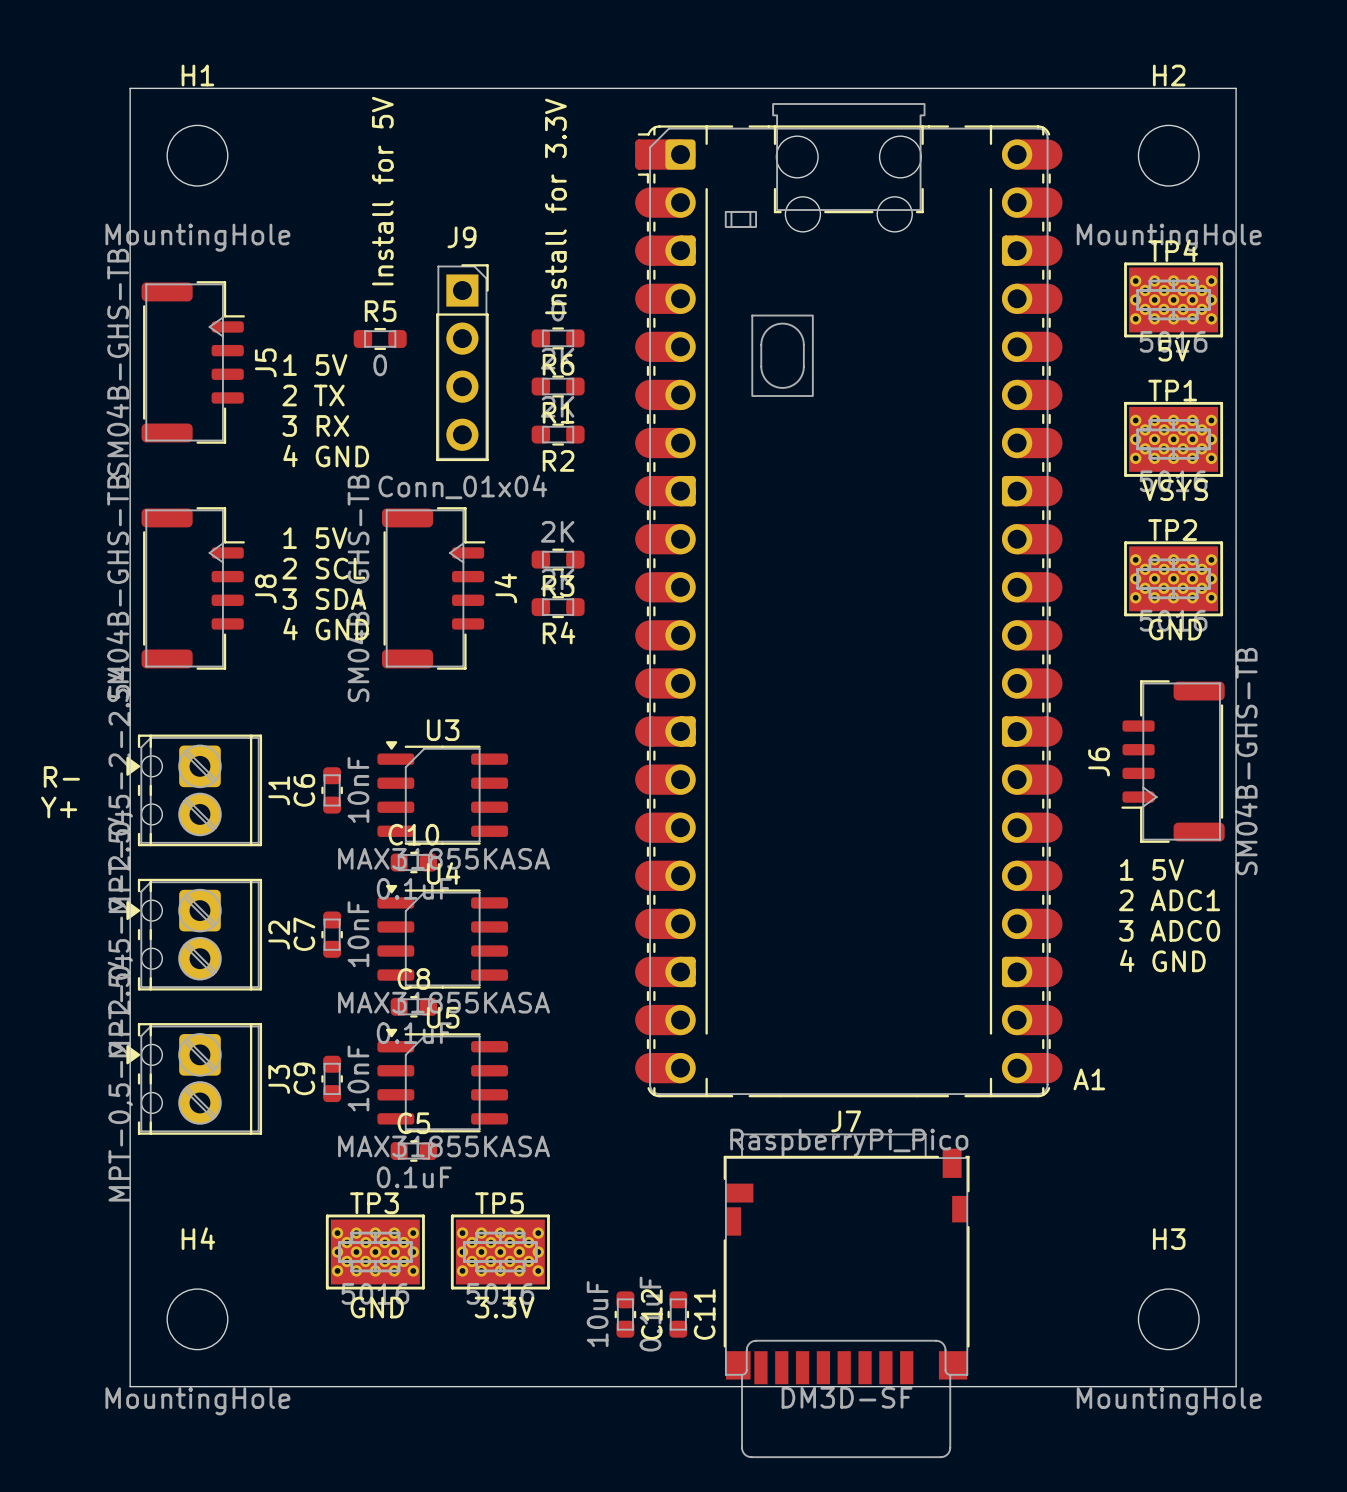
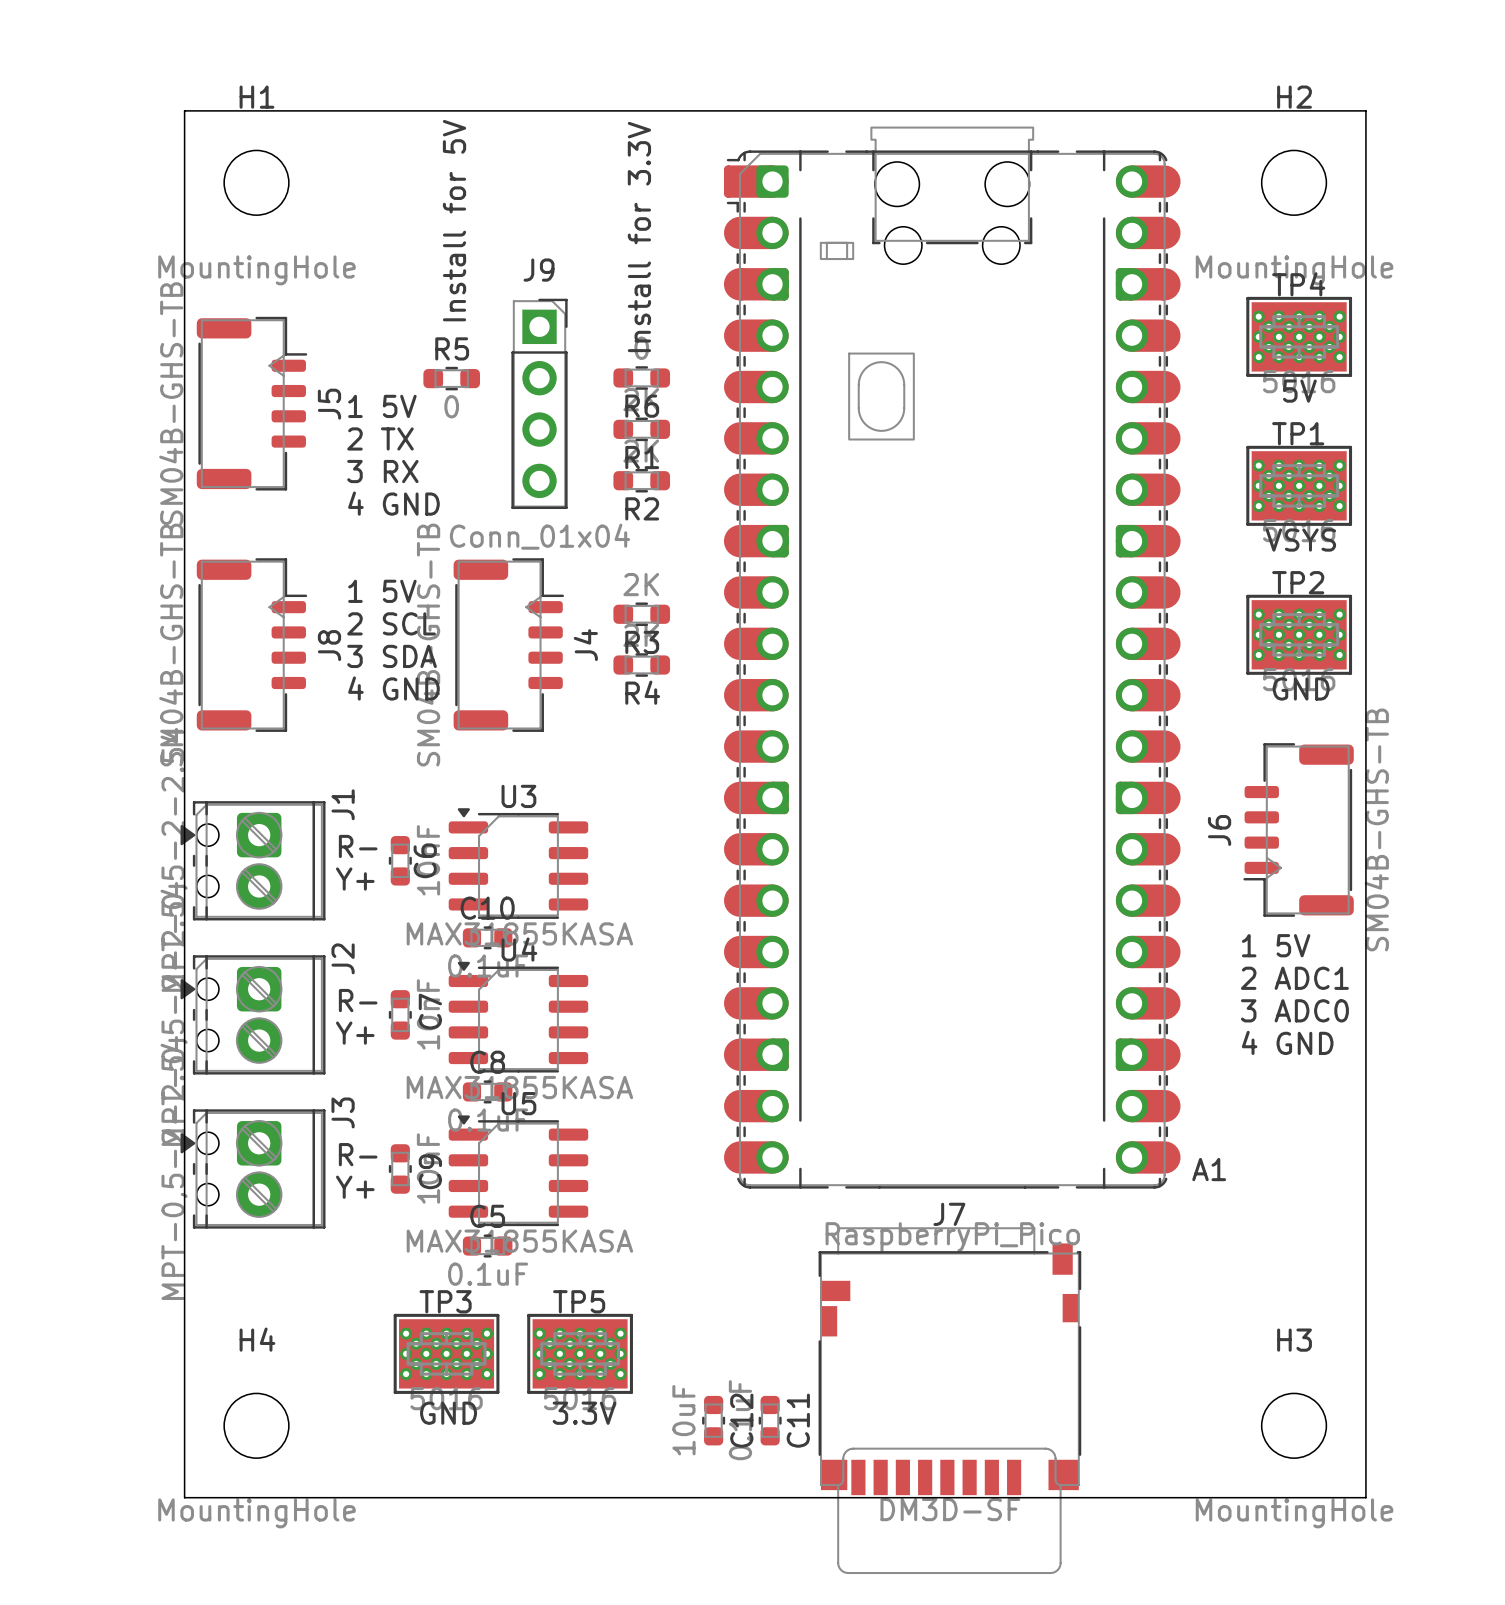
text: R- (61, 776) -> none
text: none -> R- (358, 846)
J1 name position: J1 (279, 790) -> J1 (343, 804)
C6 name position: C6 (304, 790) -> C6 (425, 860)
text: Y+ (59, 807) -> none
text: none -> Y+ (355, 879)
text: none -> R- (358, 1000)
C7 name position: C7 (304, 934) -> C7 (430, 1011)
J2 name position: J2 (279, 935) -> J2 (343, 958)
text: none -> Y+ (355, 1033)
text: none -> R- (358, 1154)
C9 name position: C9 (304, 1078) -> C9 (430, 1171)
J3 name position: J3 (279, 1079) -> J3 (343, 1112)
text: none -> Y+ (355, 1187)

